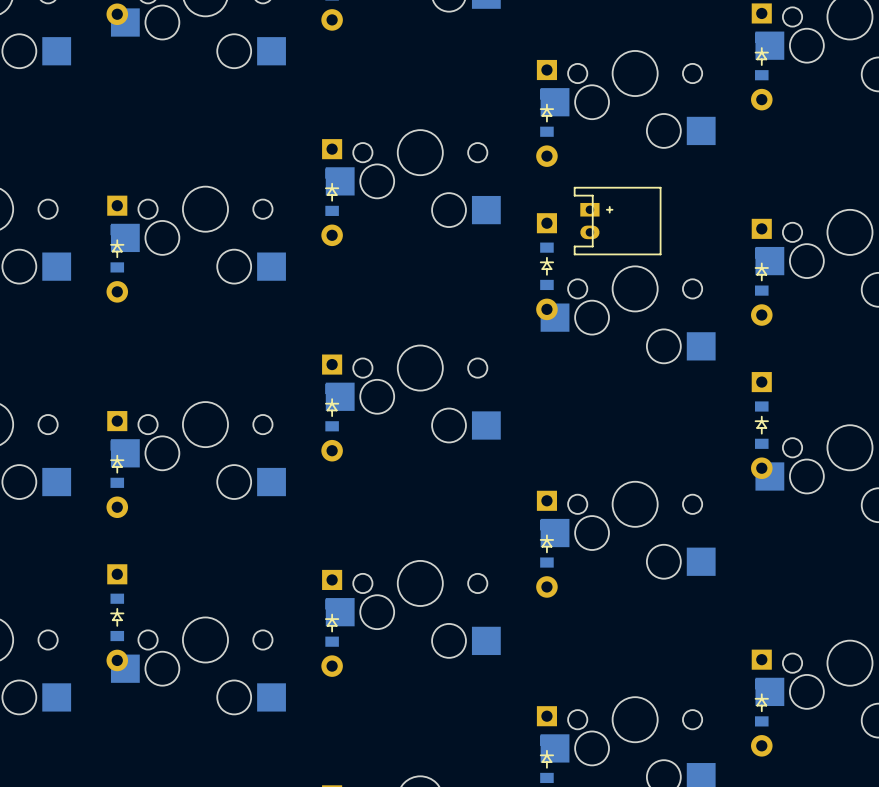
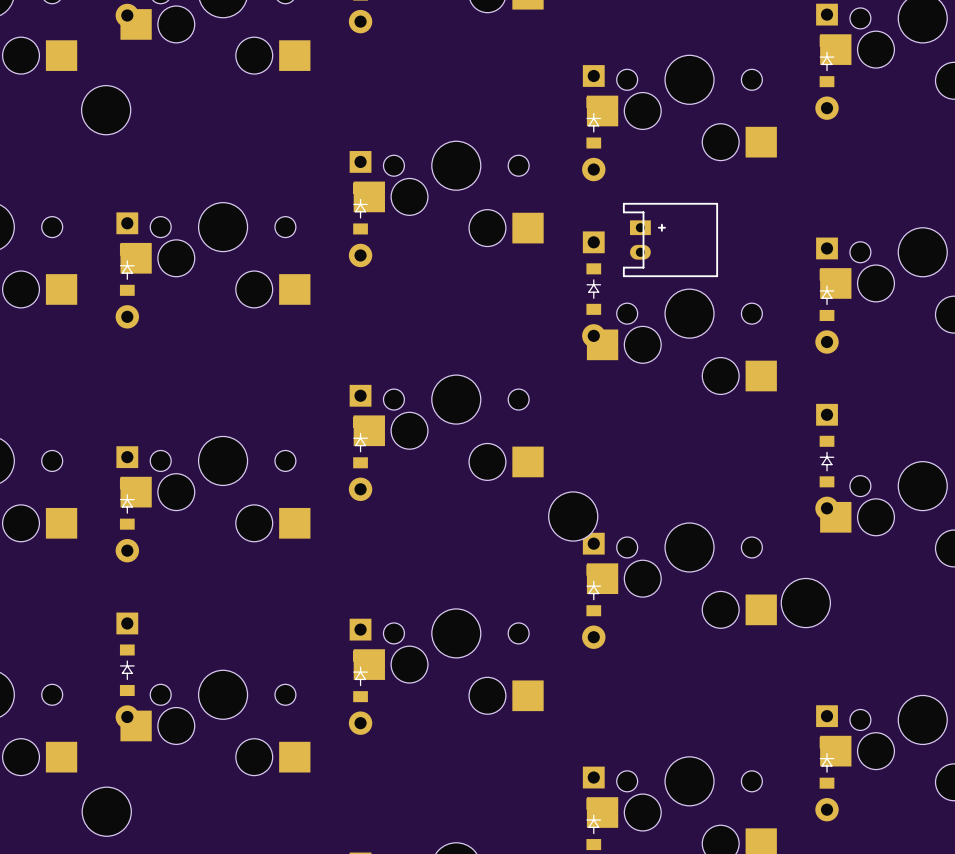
part: none -> (106, 110)
part: none -> (573, 516)
part: none -> (805, 603)
part: none -> (106, 811)

